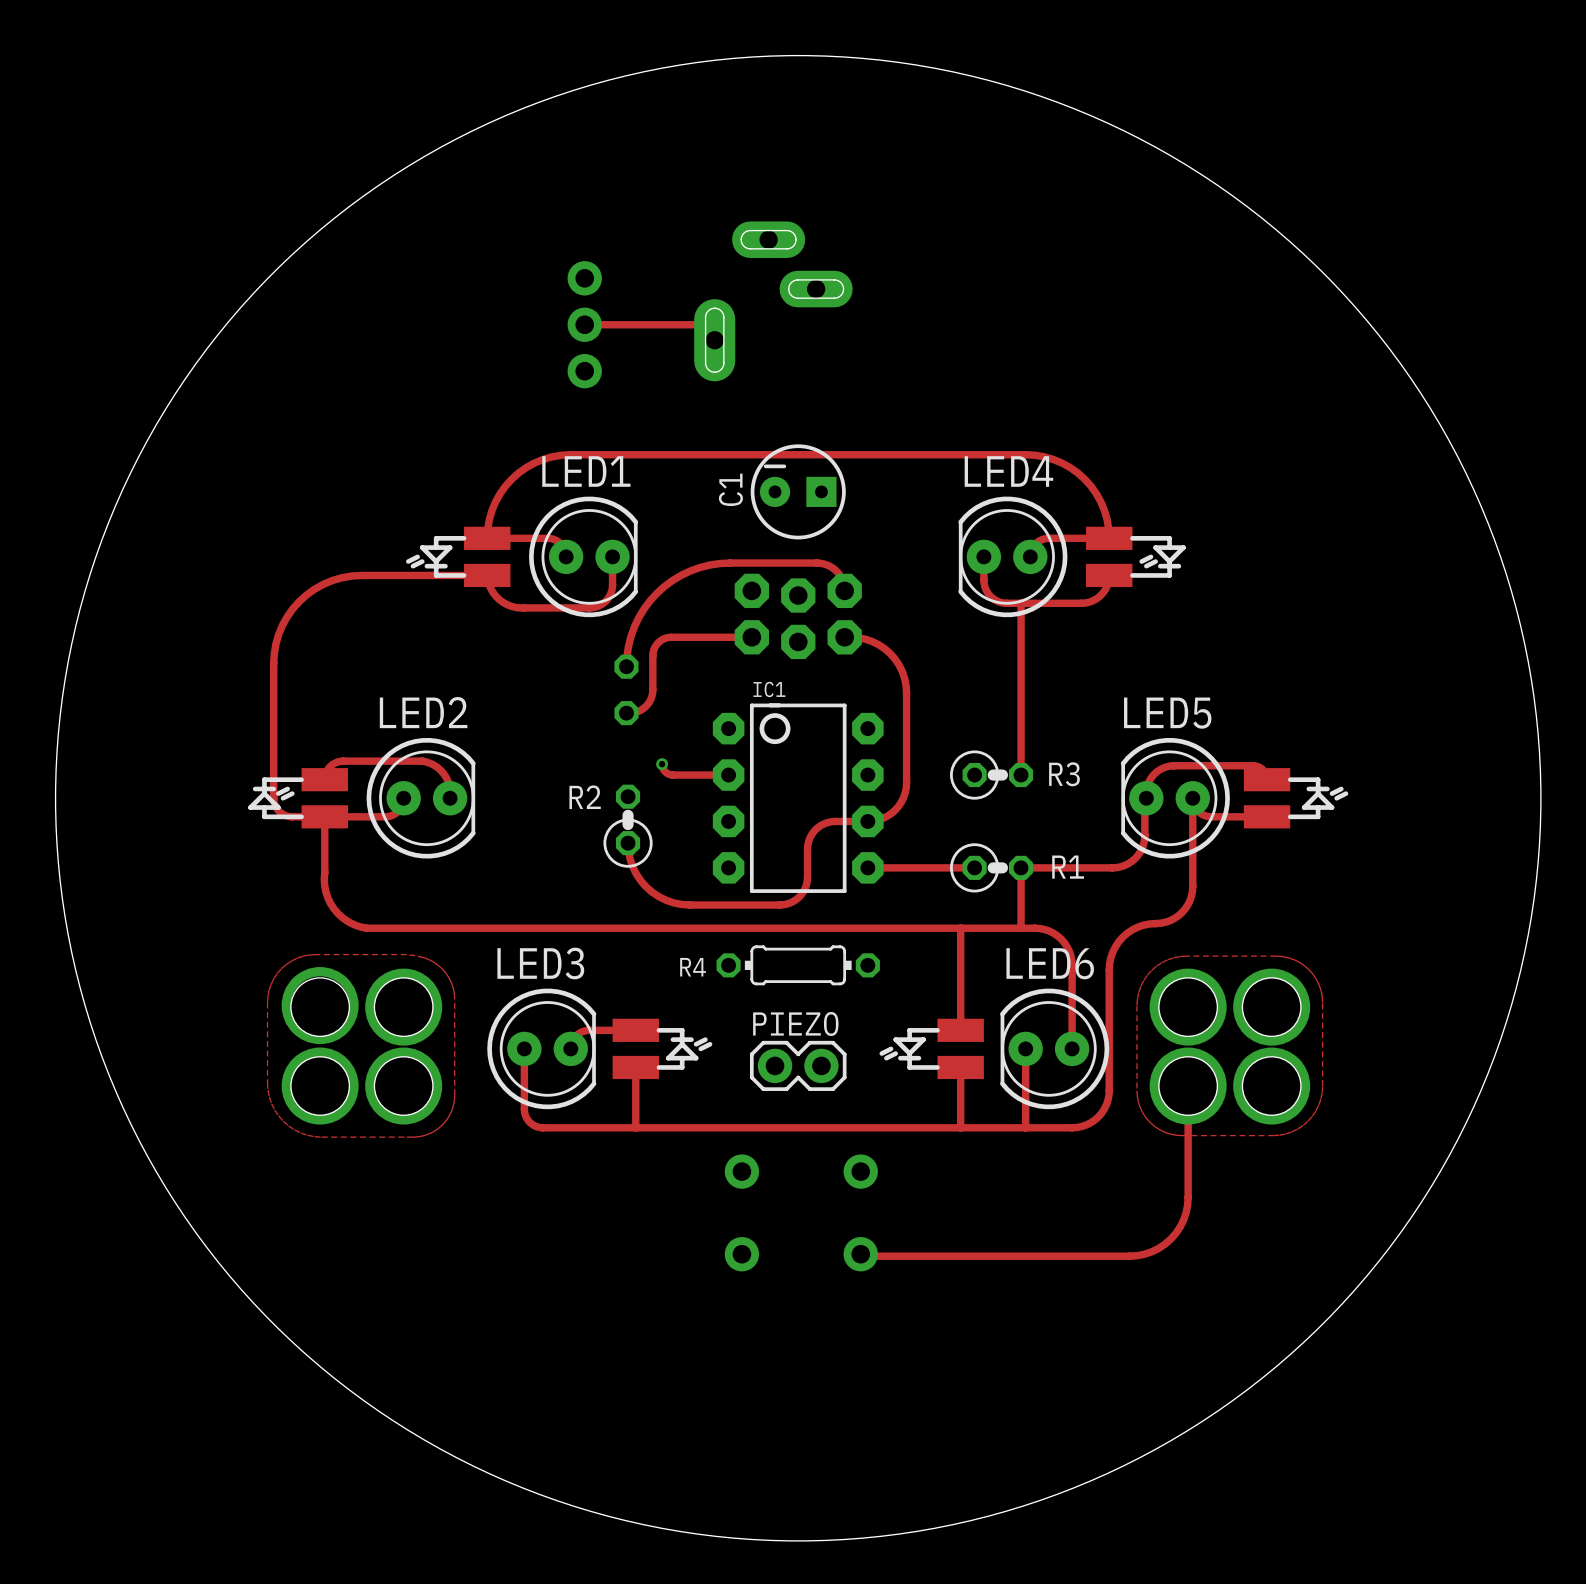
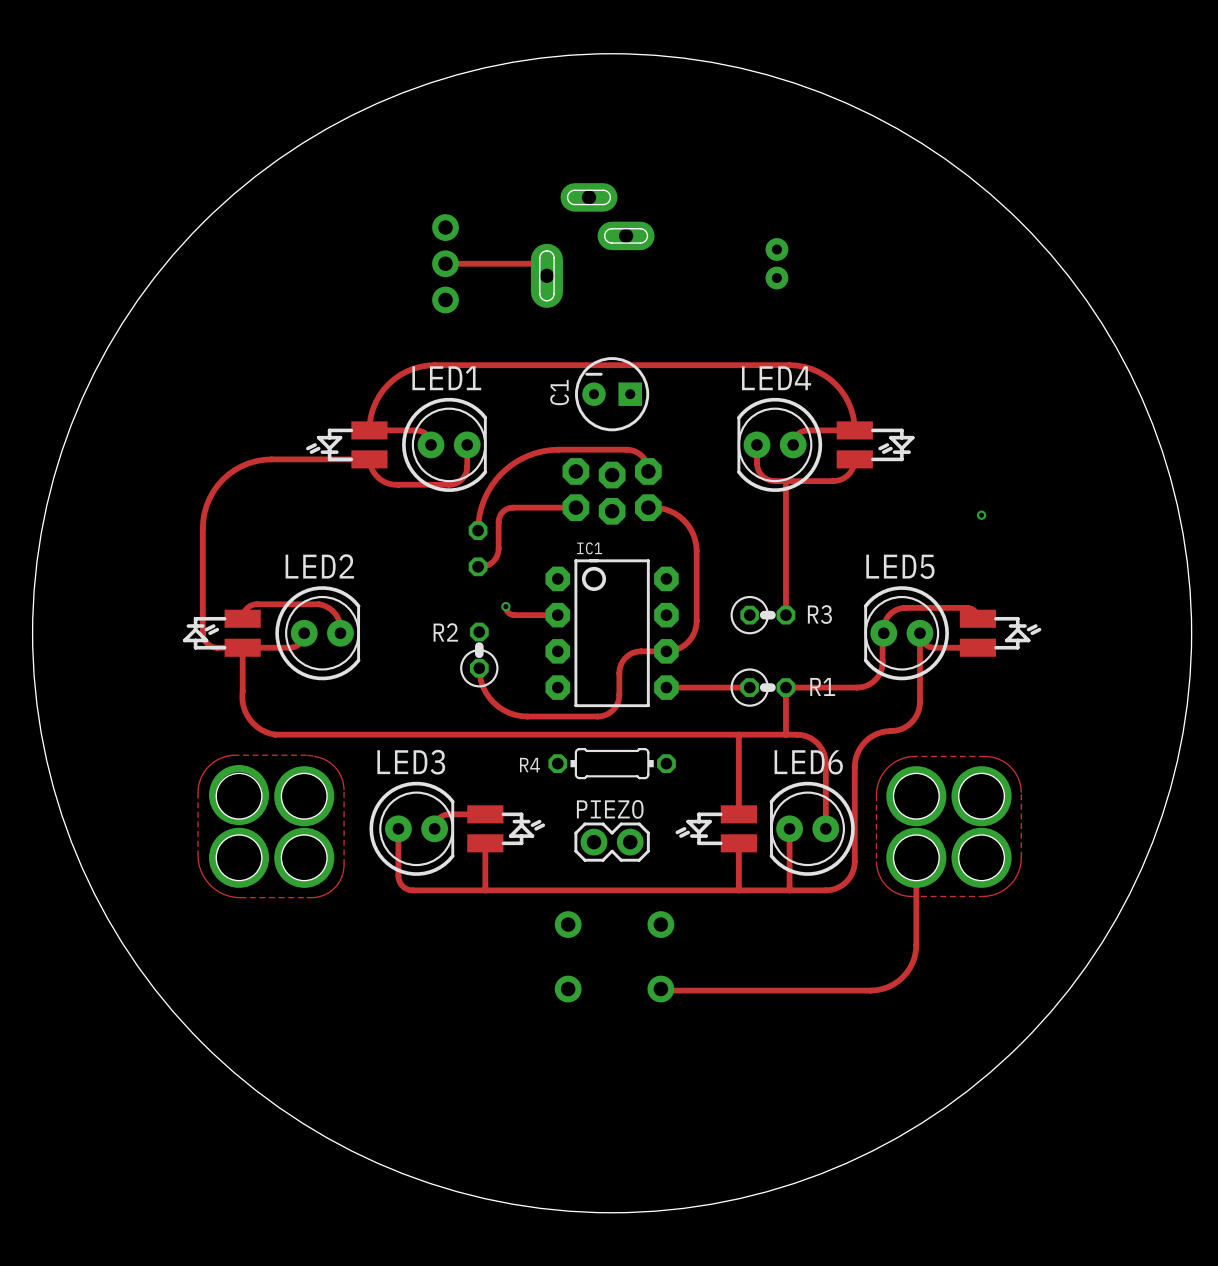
part: none -> (776, 263)
via: none -> (981, 515)

